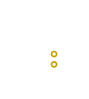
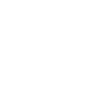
part: (54, 59) -> none

